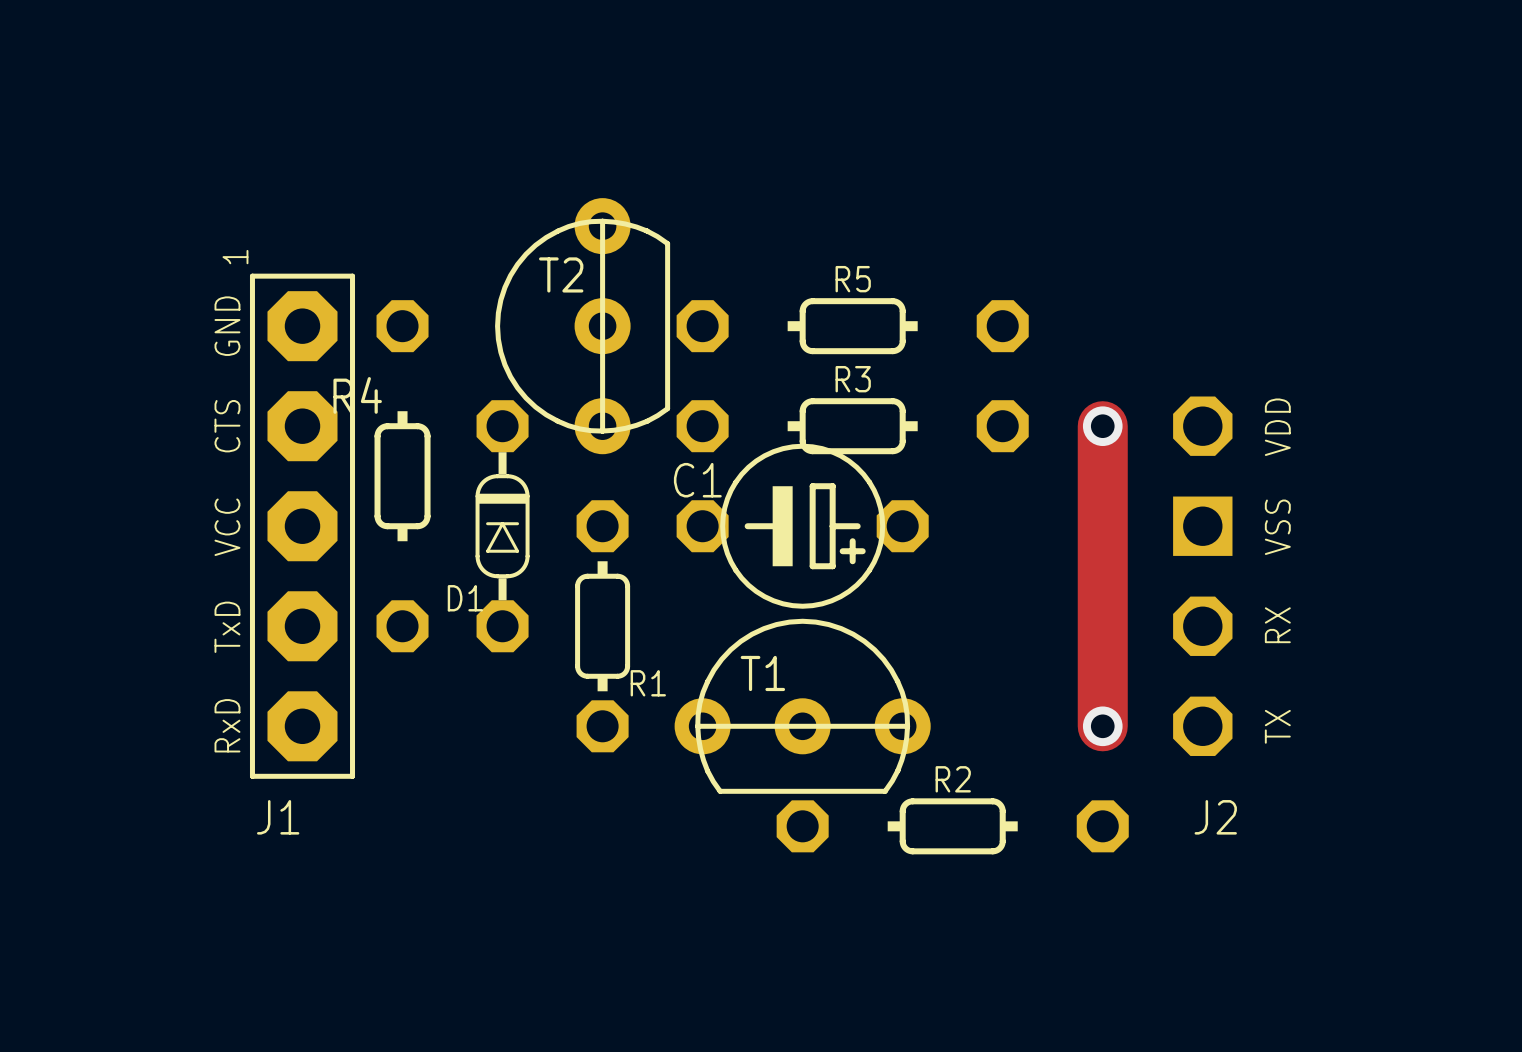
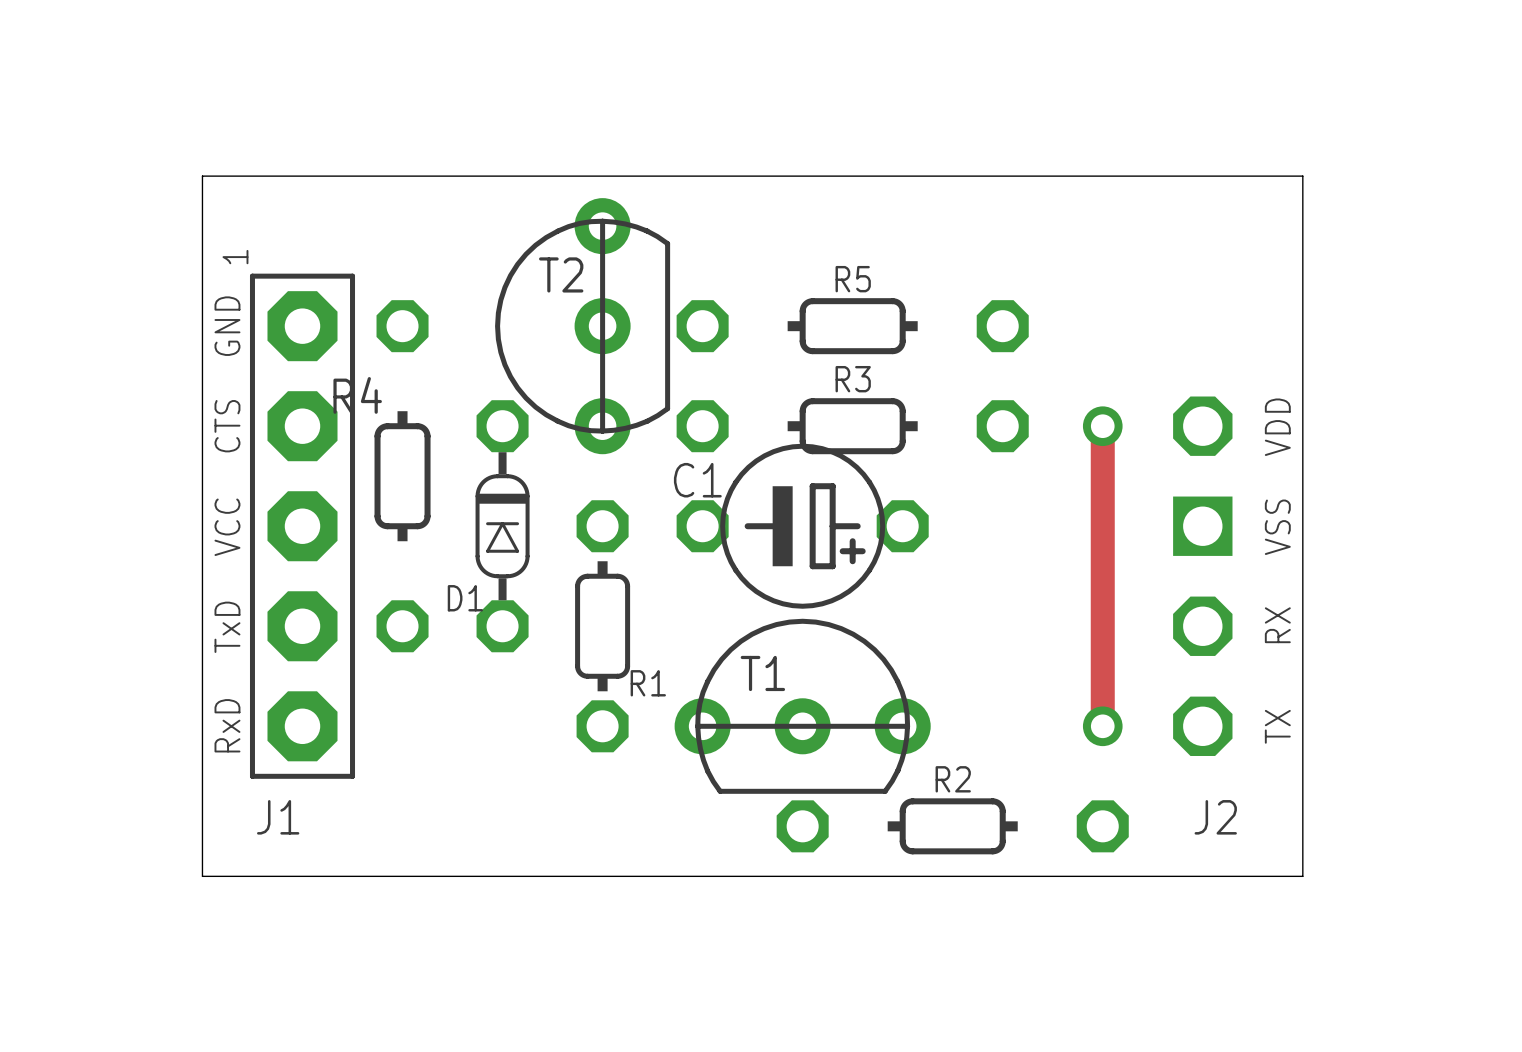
board edge: none -> (202, 176) (1302, 176) (1302, 876) (202, 876) (202, 176)
track width: thick (1102, 426) (1102, 726) -> thin (1102, 426) (1102, 726)

